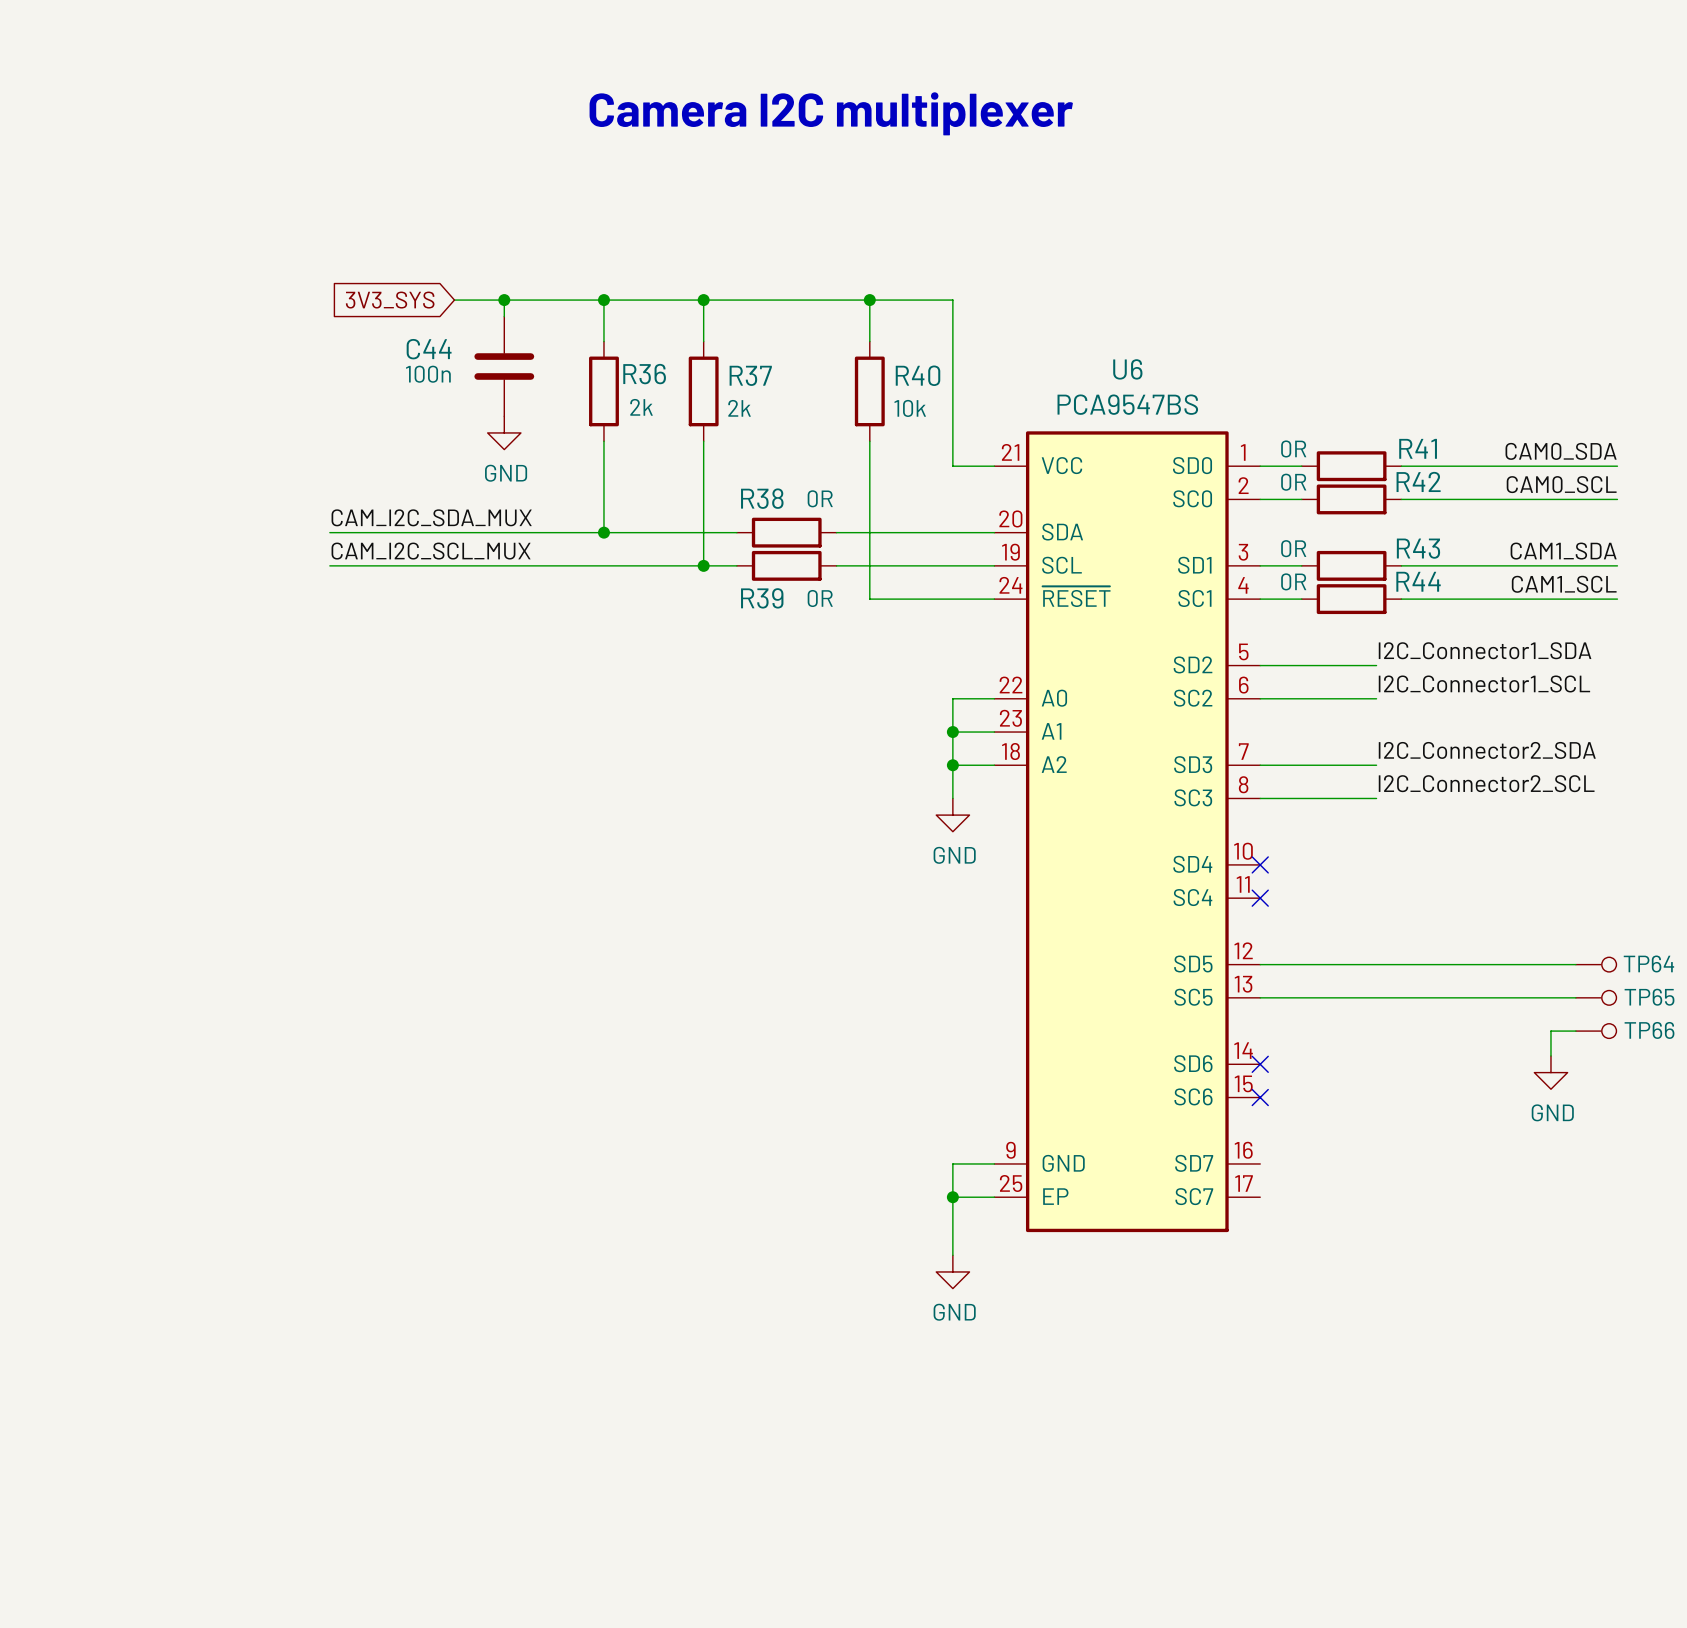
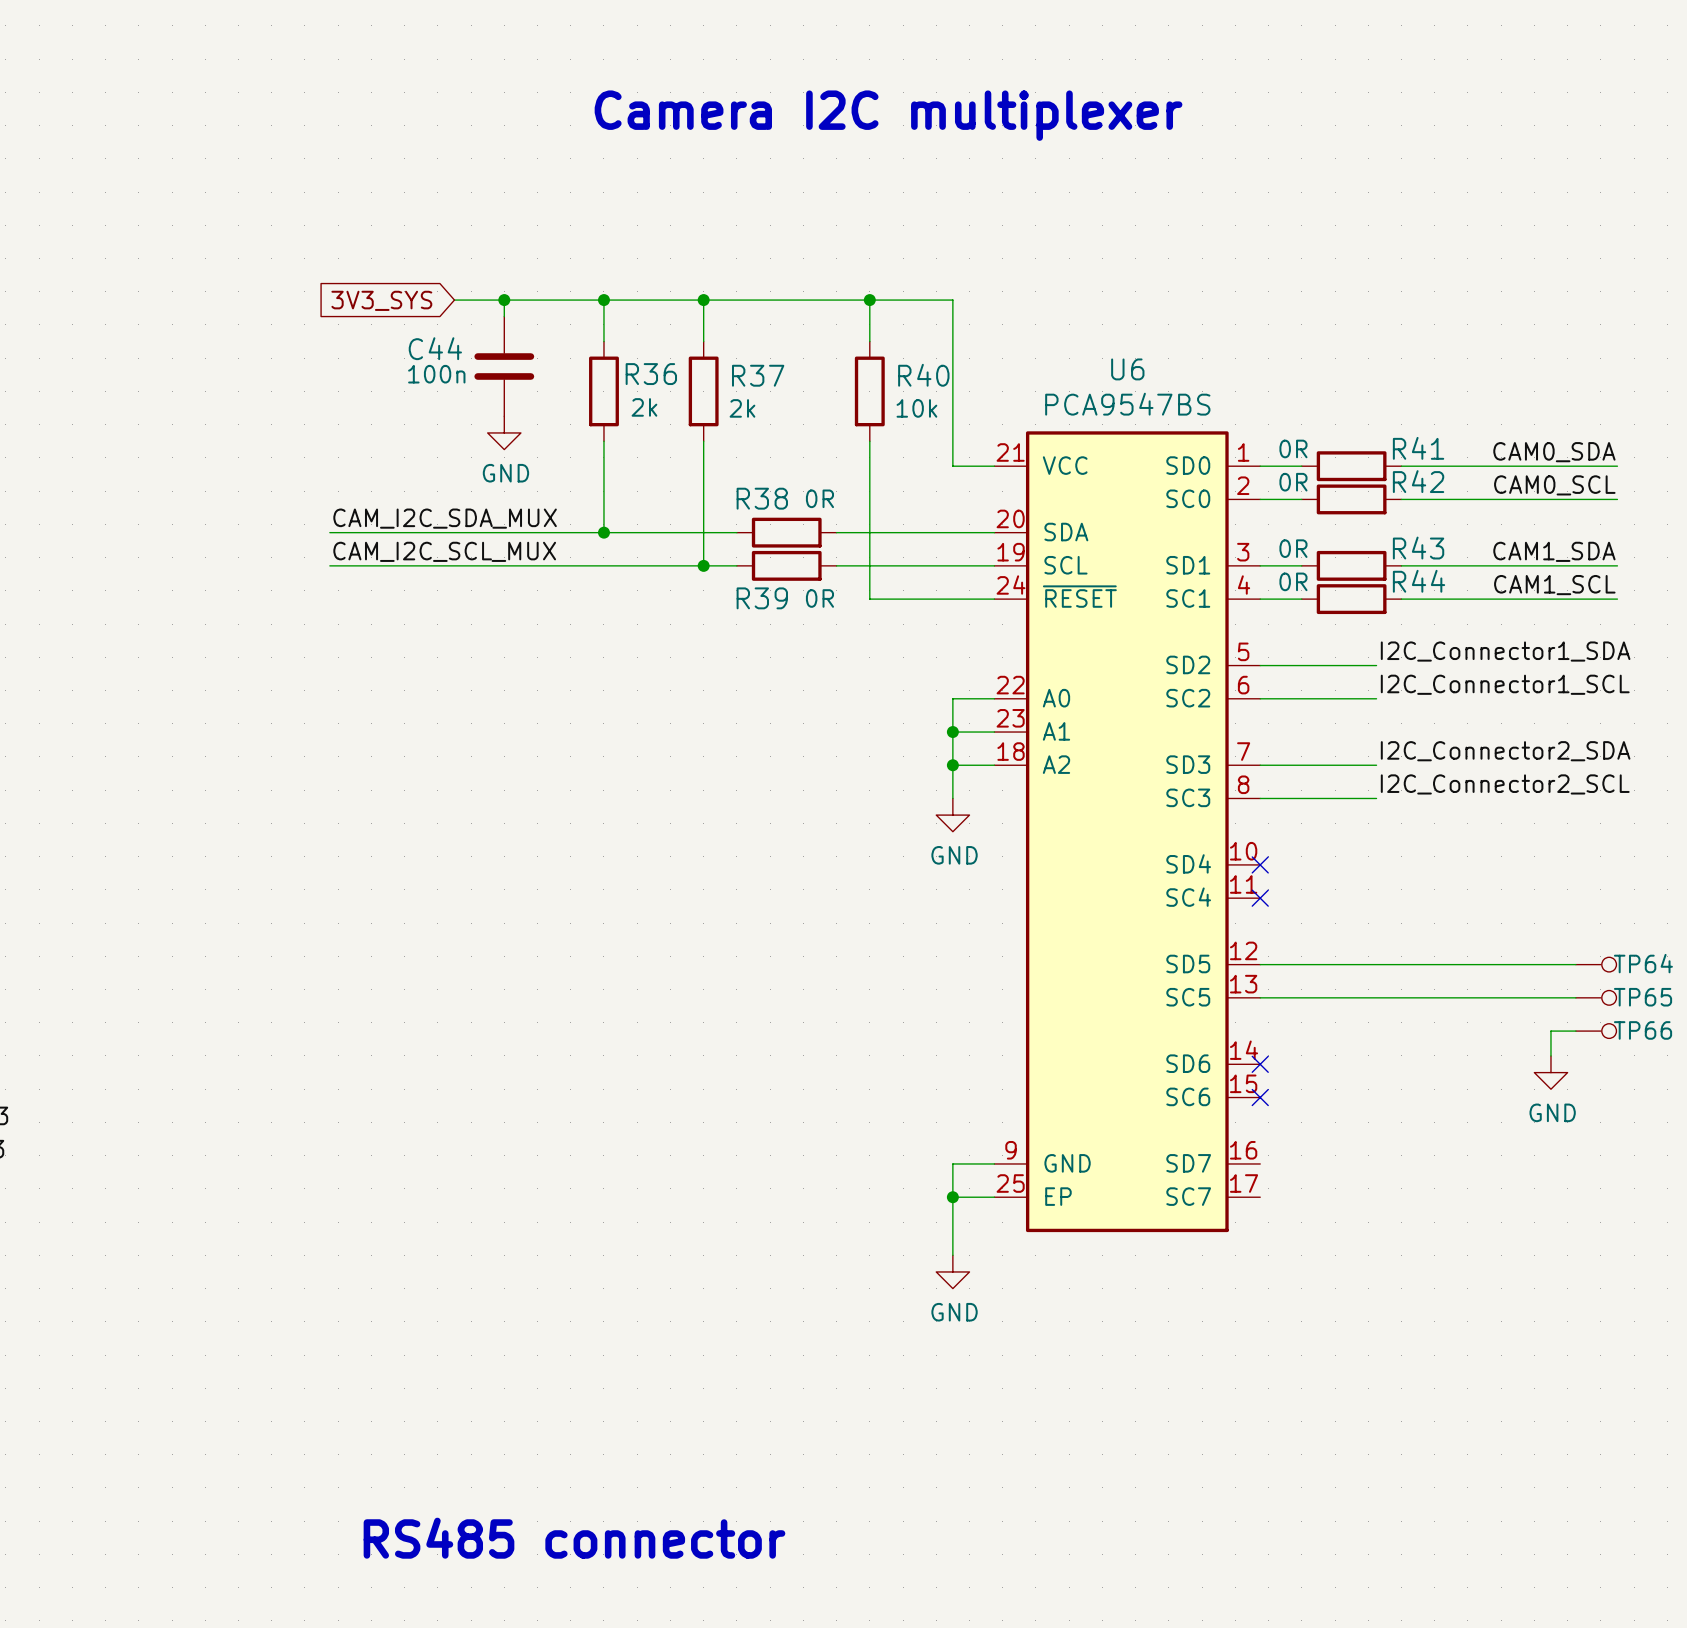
text: none -> RS485 connector (574, 1538)

